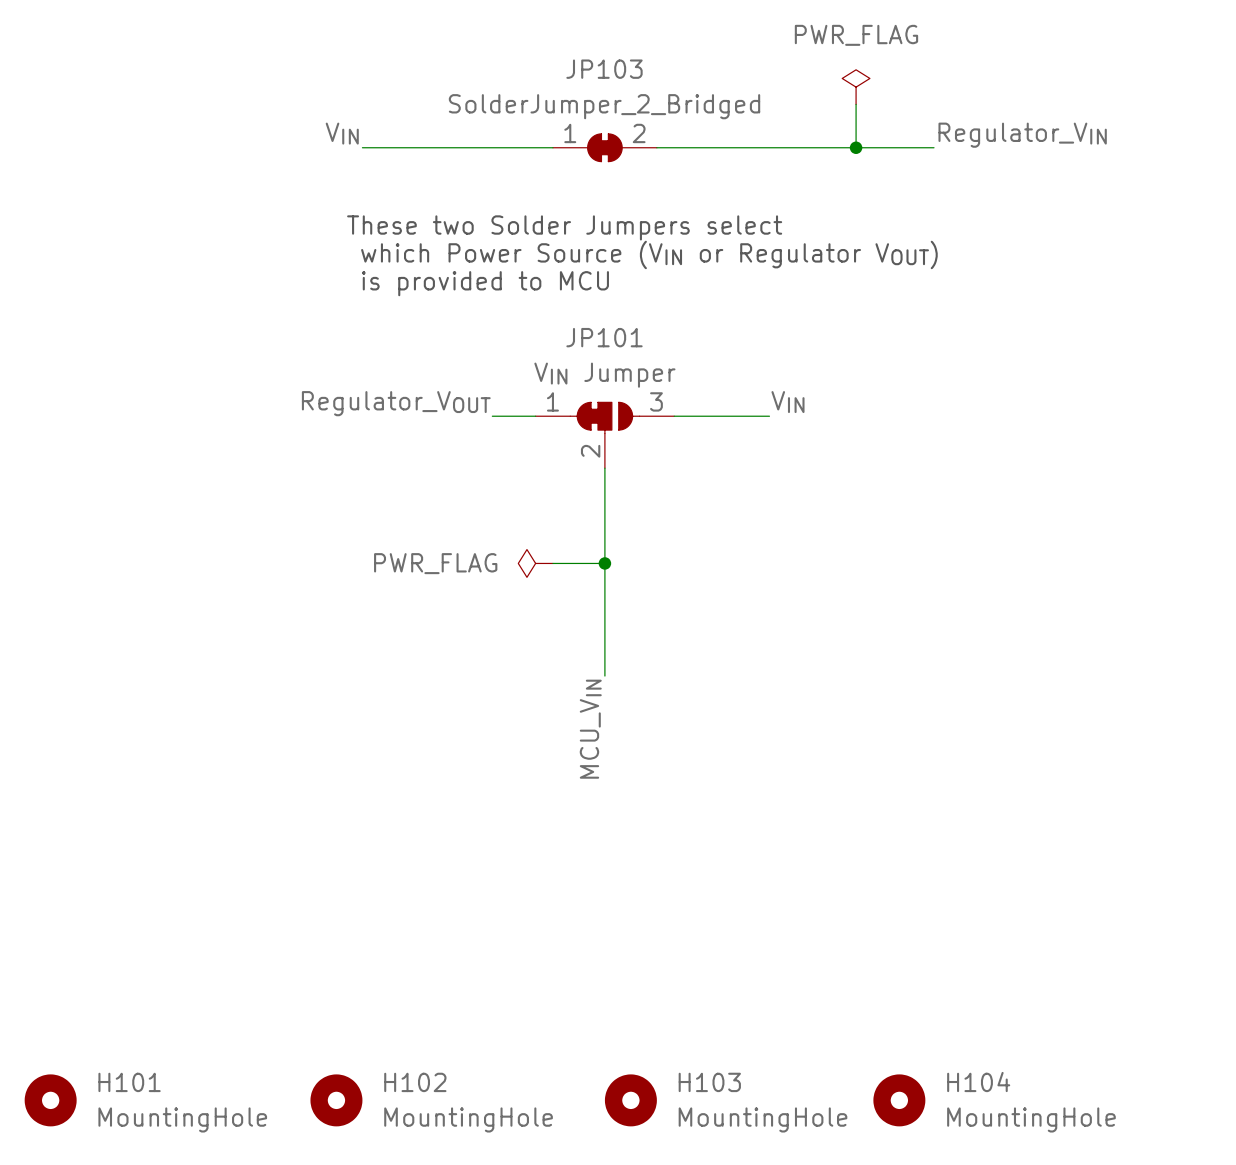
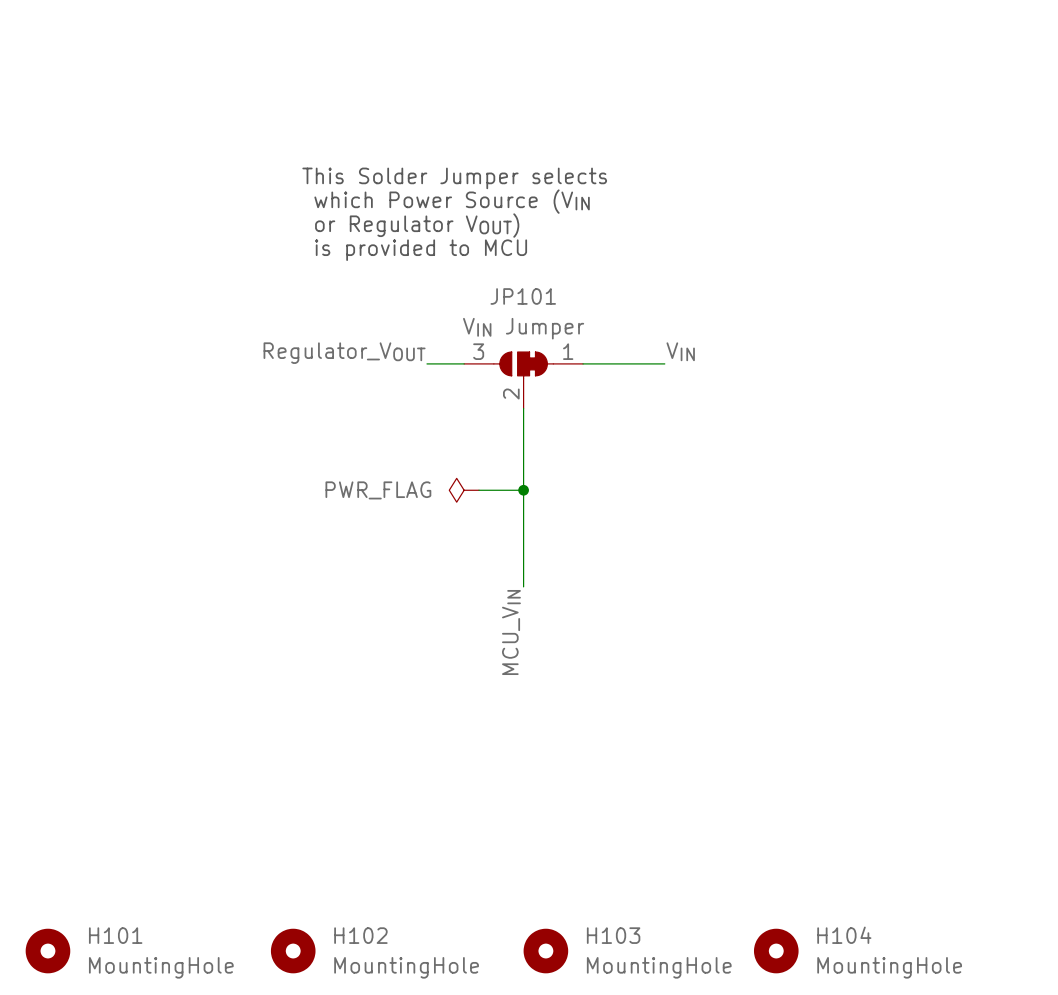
power symbol: PWR_FLAG (856, 87) -> none
wire: (856, 104) (856, 147) -> none
label: VIN (342, 133) -> none
label: Regulator_VIN (1022, 135) -> none
wire: (362, 147) (552, 147) -> none
JP103: SolderJumper_2_Bridged (604, 147) -> none
wire: (656, 147) (934, 147) -> none
junction: (856, 147) -> none
text: none -> This Solder Jumper selects (454, 178)
text: These two Solder Jumpers select (564, 227) -> which Power Source (VIN (452, 201)
text: which Power Source (VIN or Regulator VOUT) (649, 254) -> or Regulator VOUT) (417, 225)
JP101 flip: as is (604, 417) -> left-right (523, 365)

